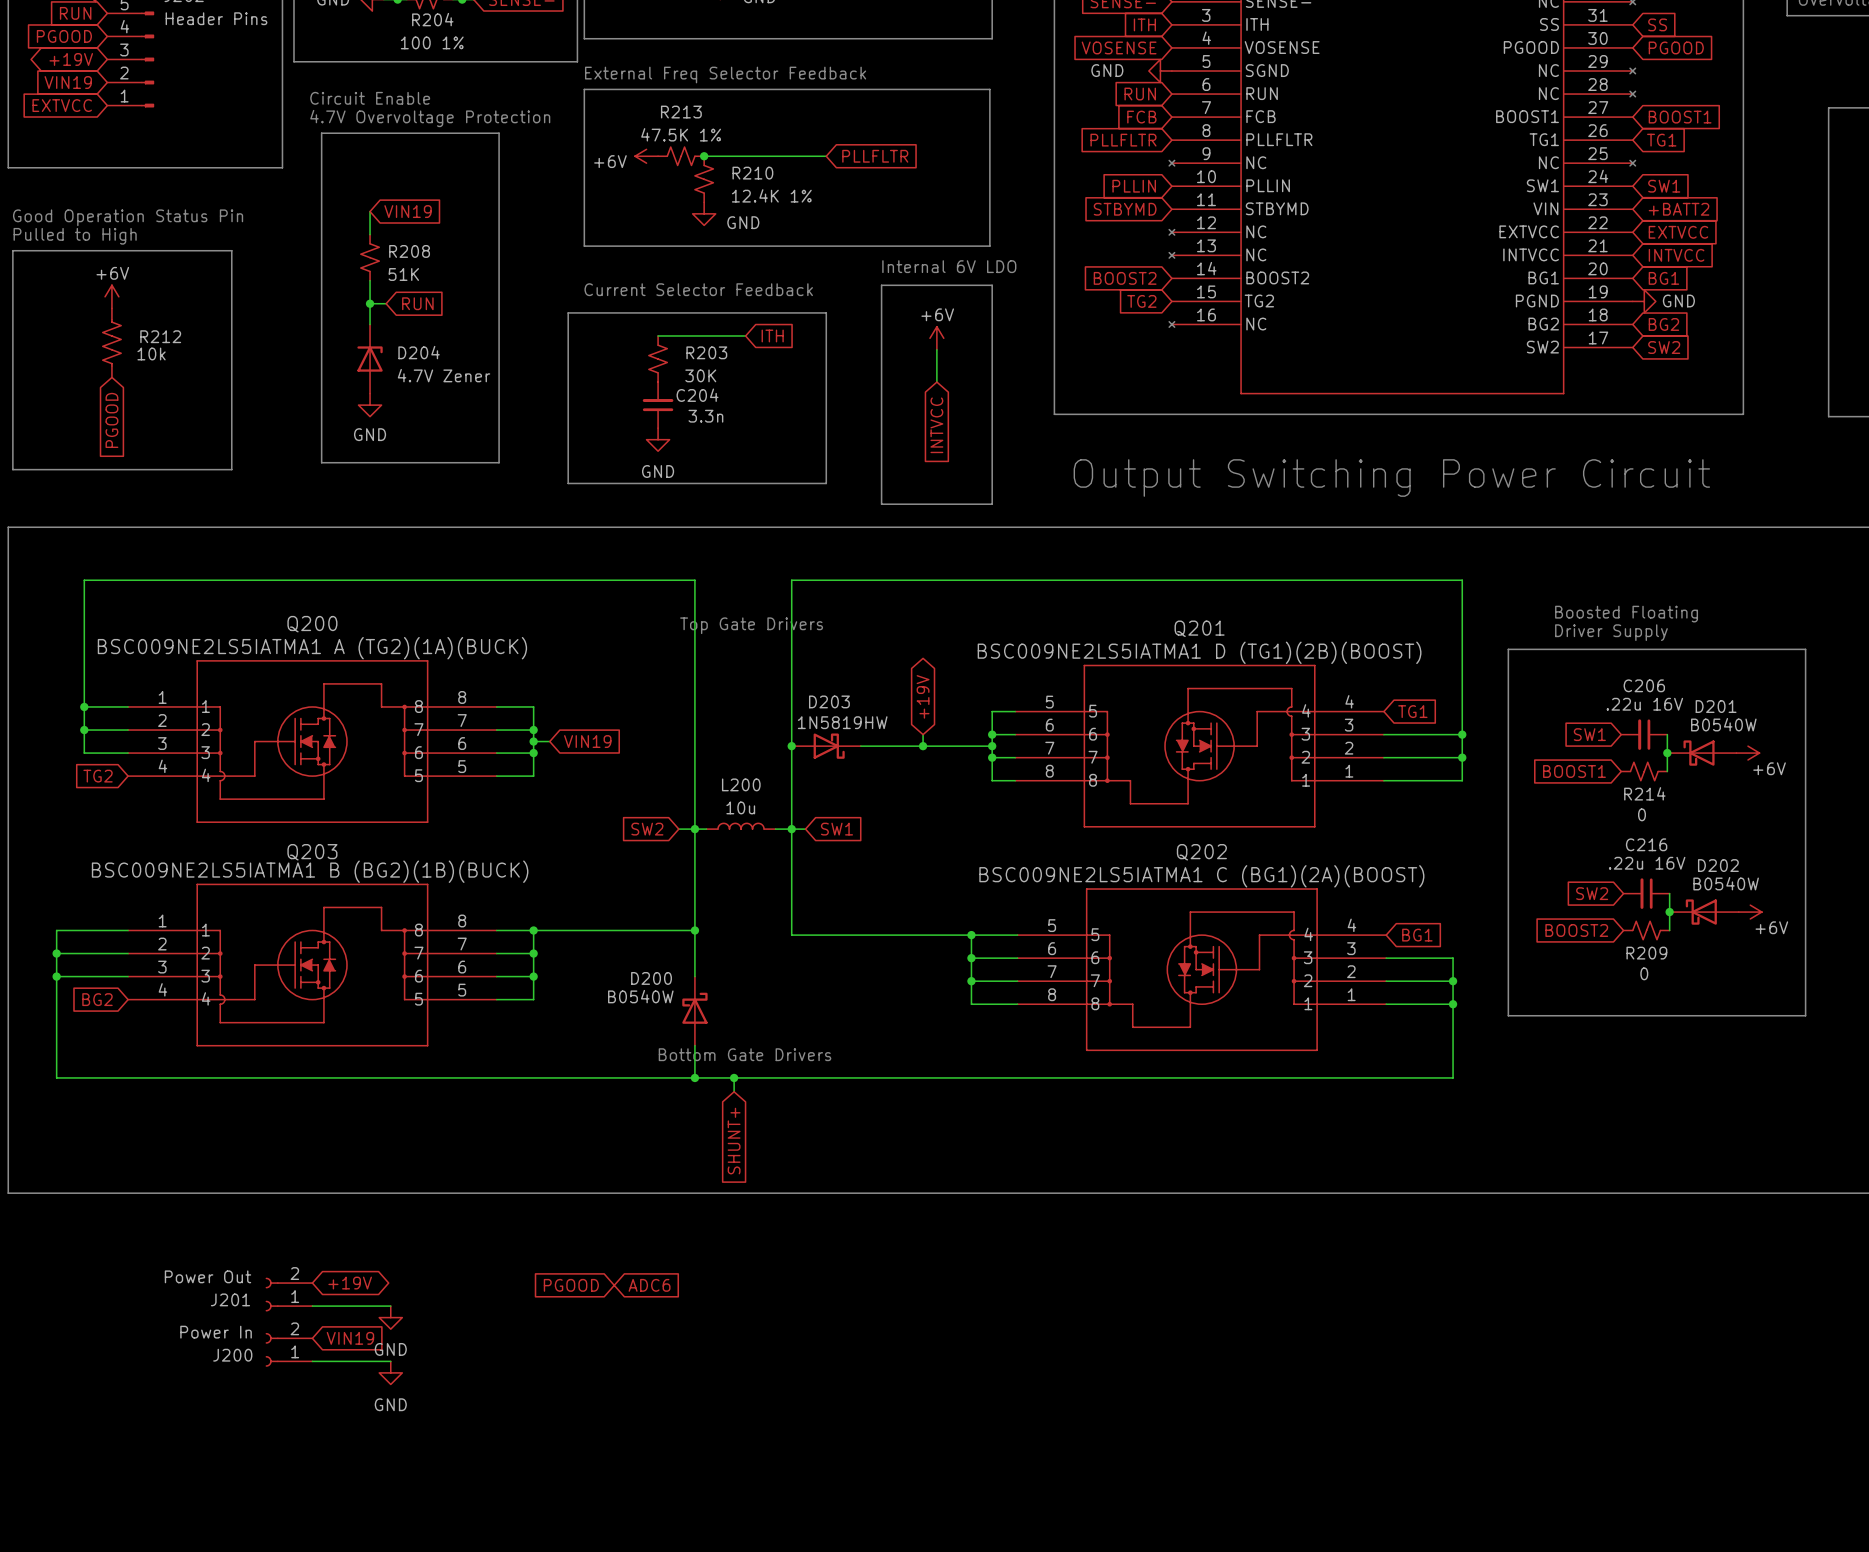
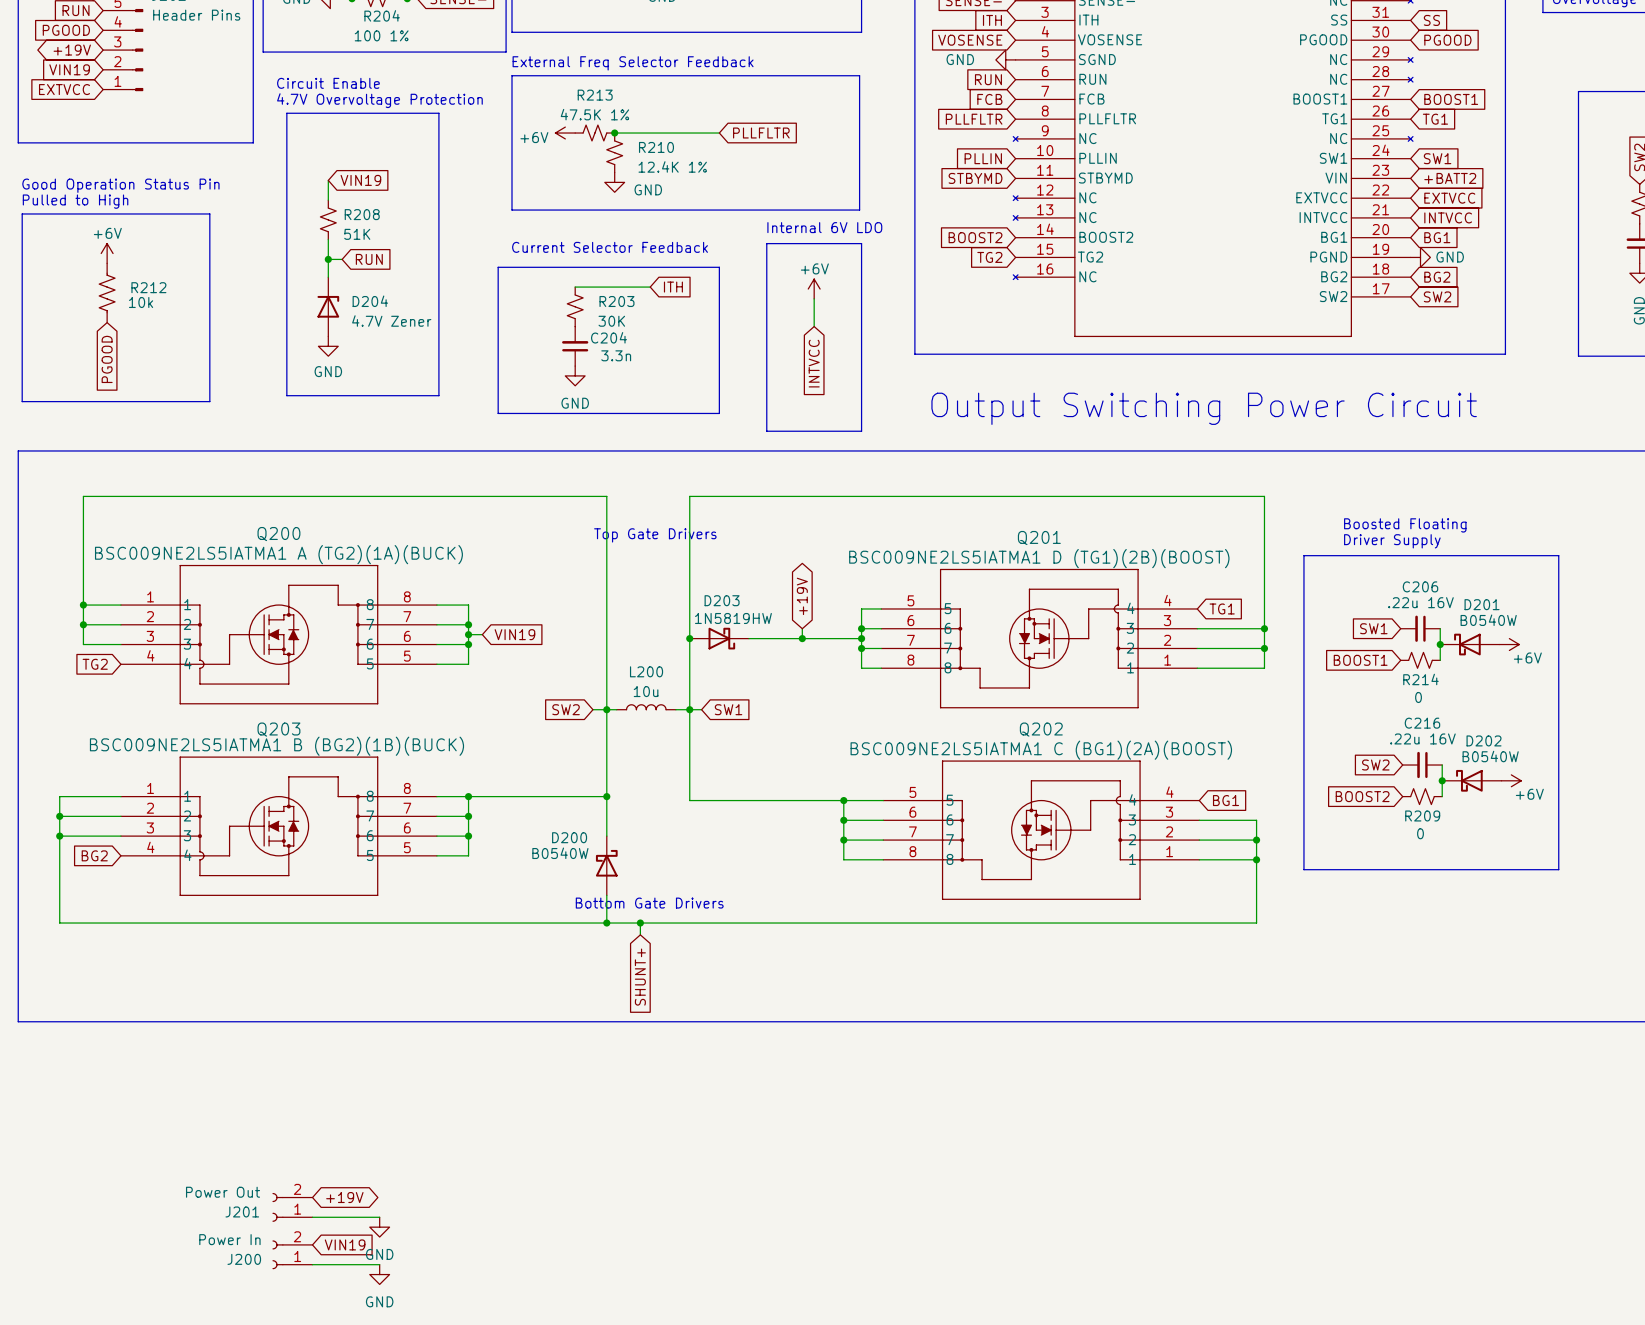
global label position: +19V (350, 1283) -> +19V (344, 1197)
global label: PGOOD (571, 1285) -> none
global label: ADC6 (649, 1285) -> none
J201 position: (289, 1294) -> (292, 1207)
wire: (312, 1306) (390, 1306) -> (312, 1264) (379, 1264)
power symbol: GND (390, 1317) -> none
global label position: VIN19 (350, 1338) -> VIN19 (345, 1244)
J200 position: (289, 1349) -> (292, 1254)
wire: (312, 1361) (390, 1361) -> (312, 1217) (379, 1217)
power symbol: GND (390, 1372) -> none
power symbol: none -> GND (379, 1227)
power symbol: none -> GND (379, 1274)

